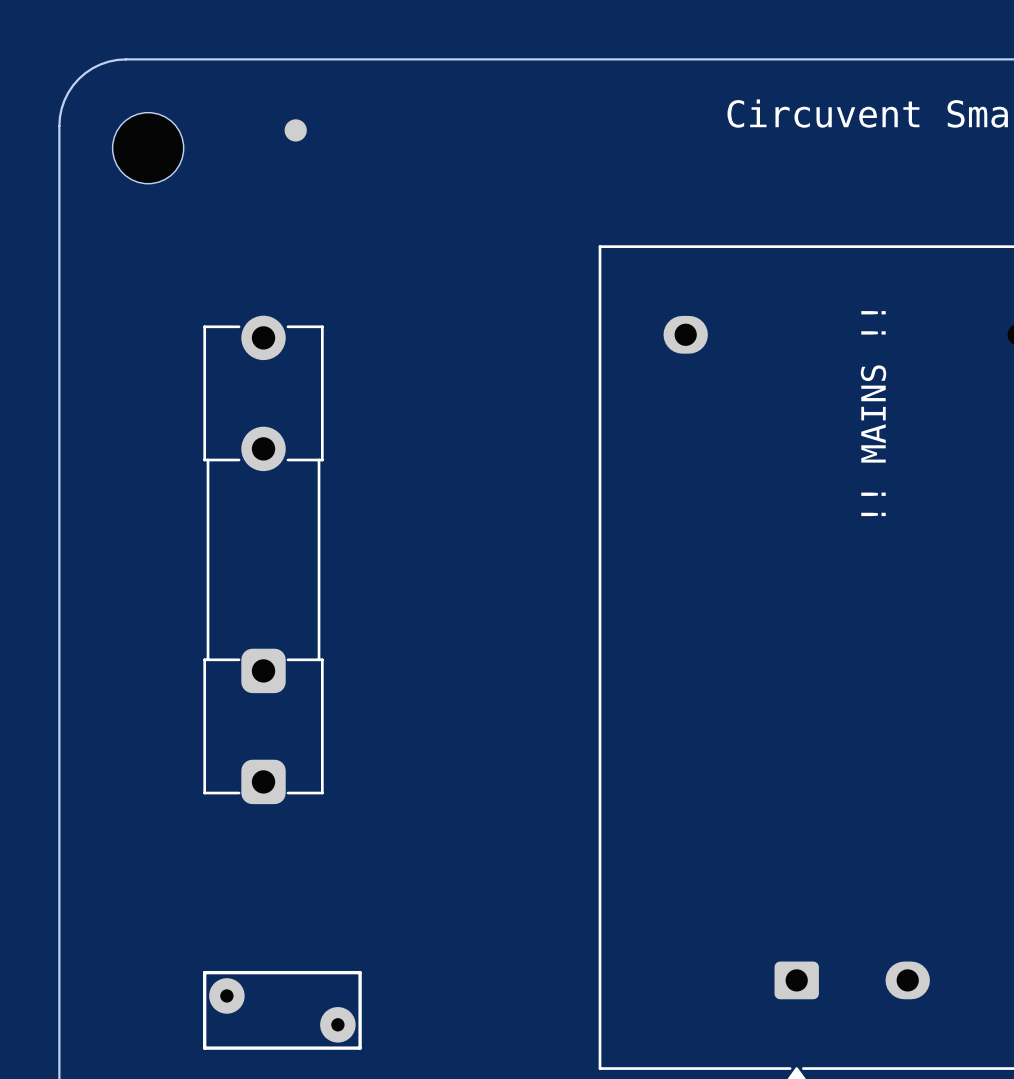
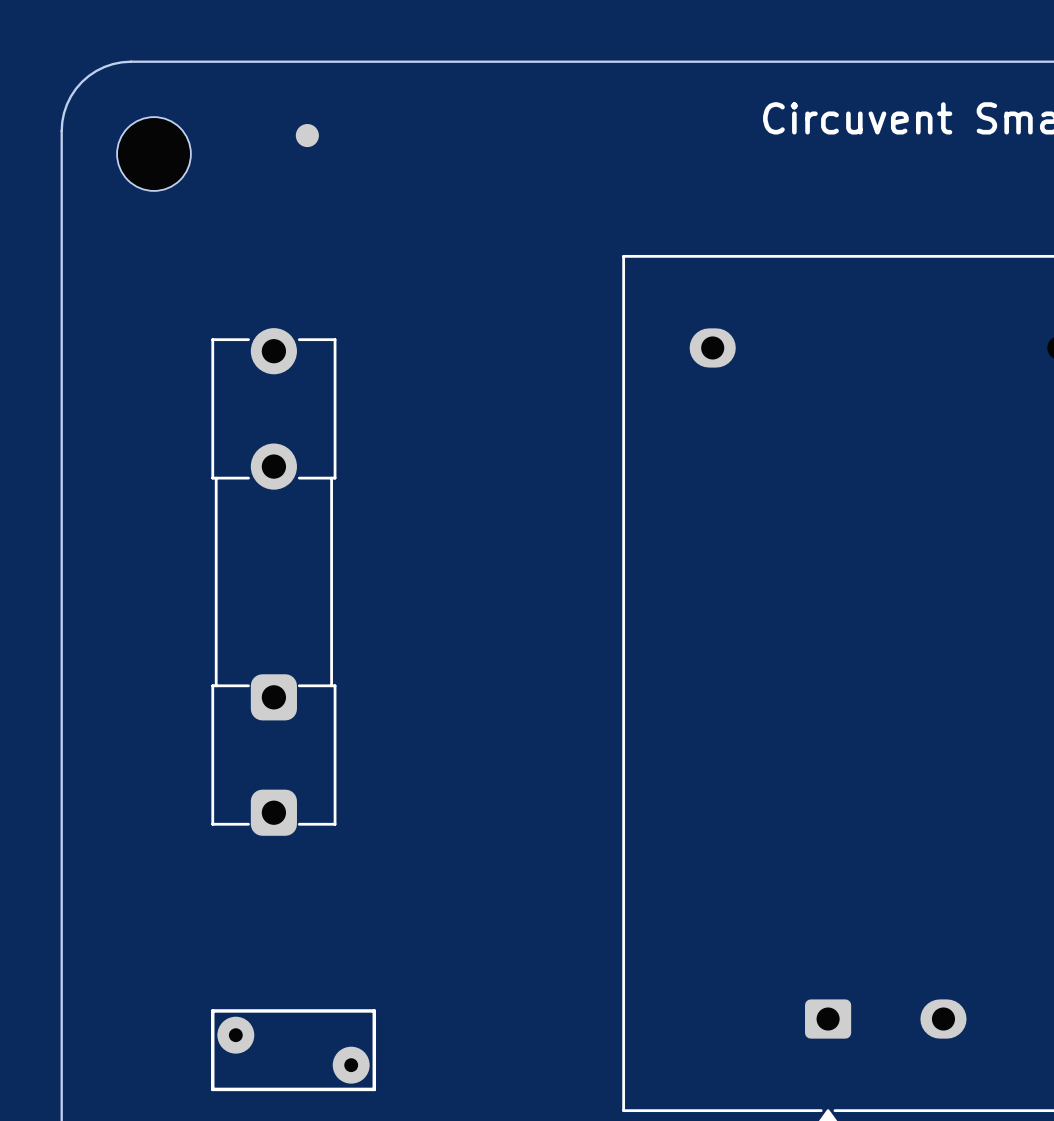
text: !! MAINS !! (873, 413) -> none

